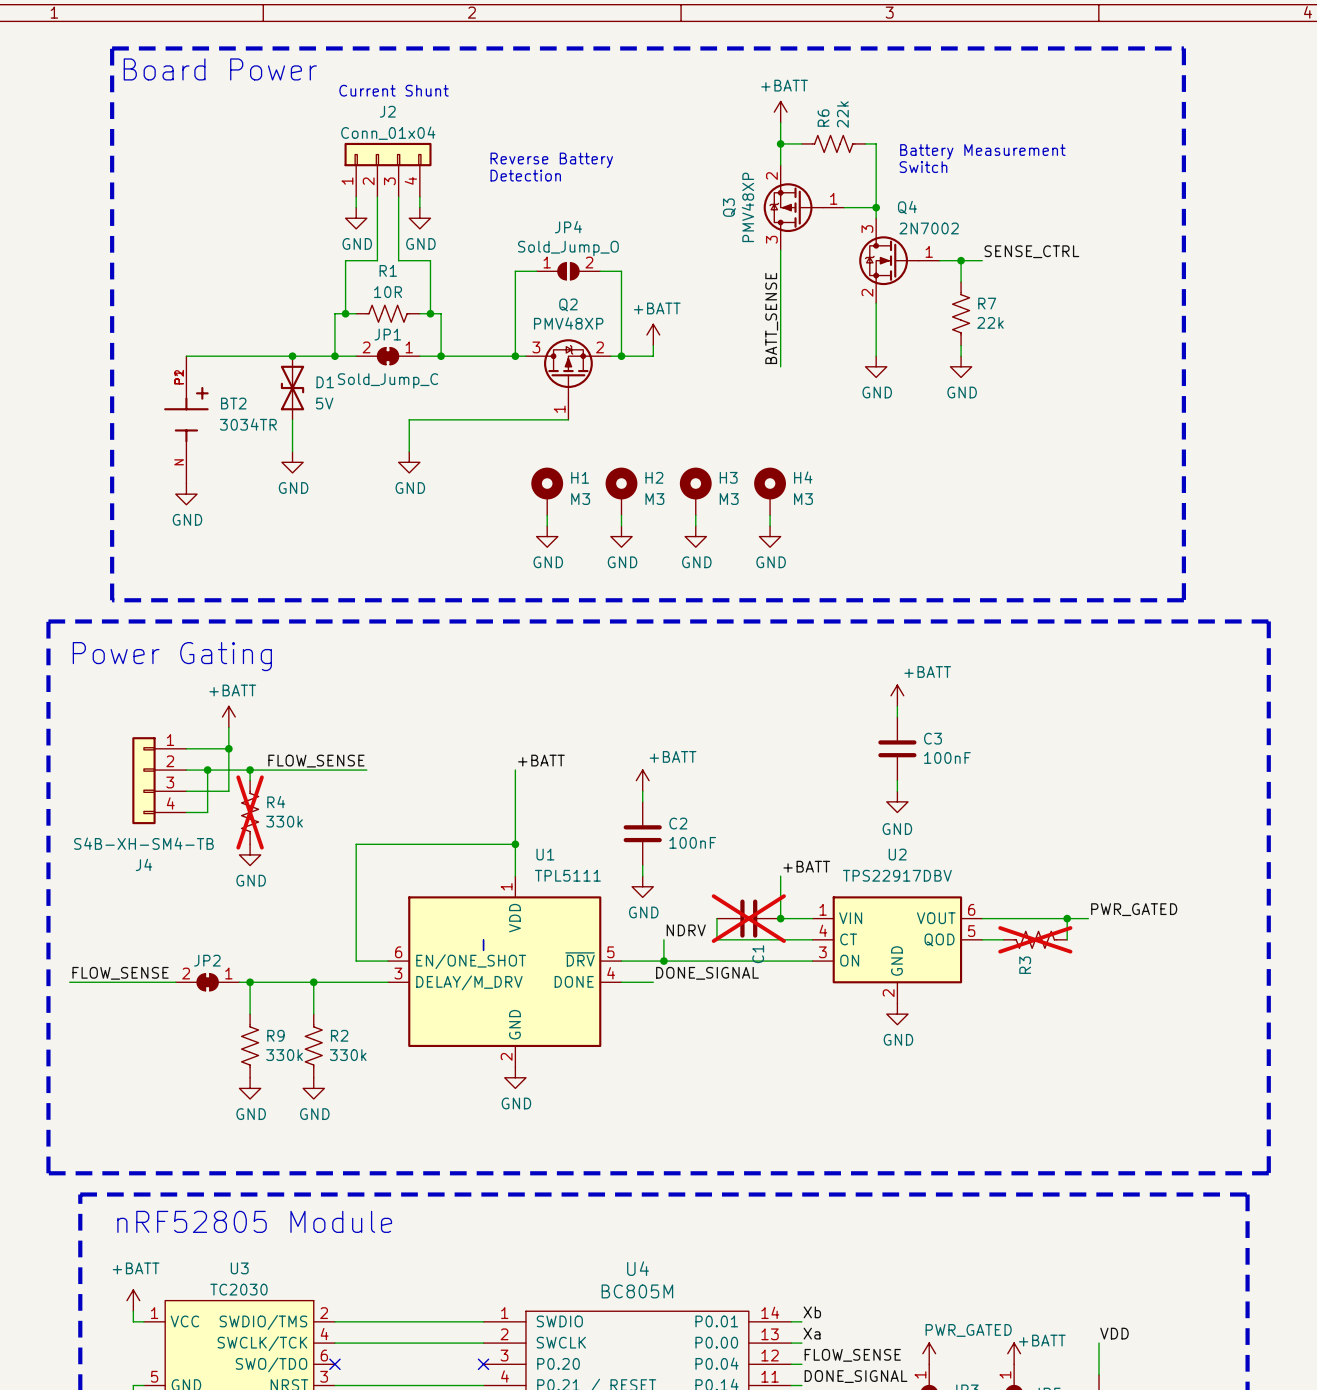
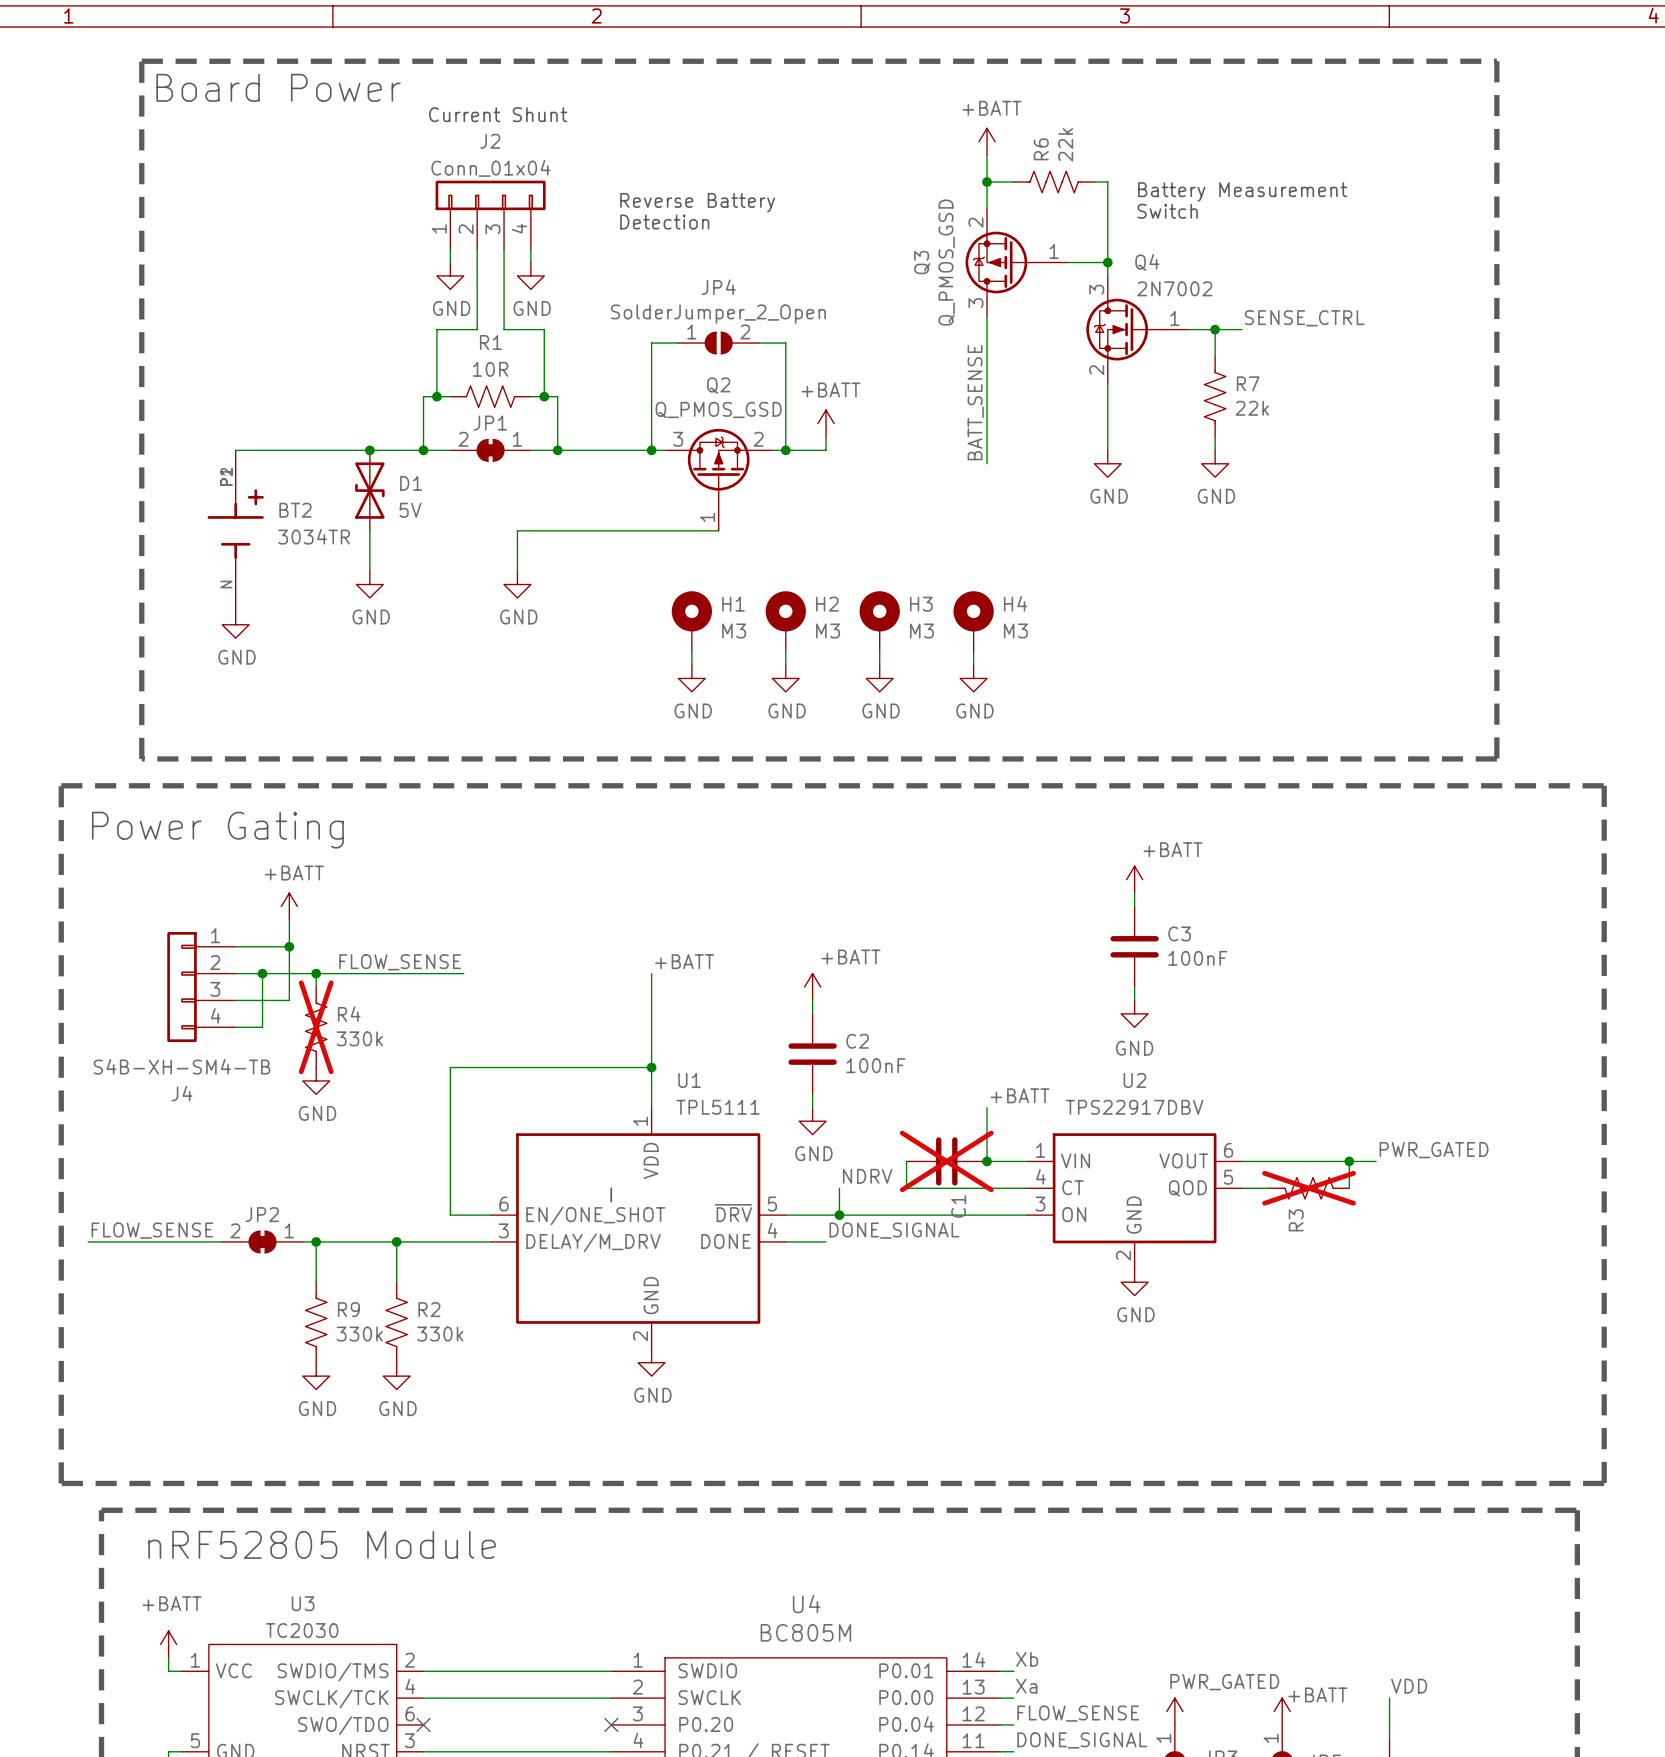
Q3 value: PMV48XP (747, 207) -> Q_PMOS_GSD (946, 262)
JP4 value: Sold_Jump_O (568, 248) -> SolderJumper_2_Open (718, 314)
Q2 value: PMV48XP (568, 323) -> Q_PMOS_GSD (718, 409)
JP1 value: Sold_Jump_C (388, 380) -> none

